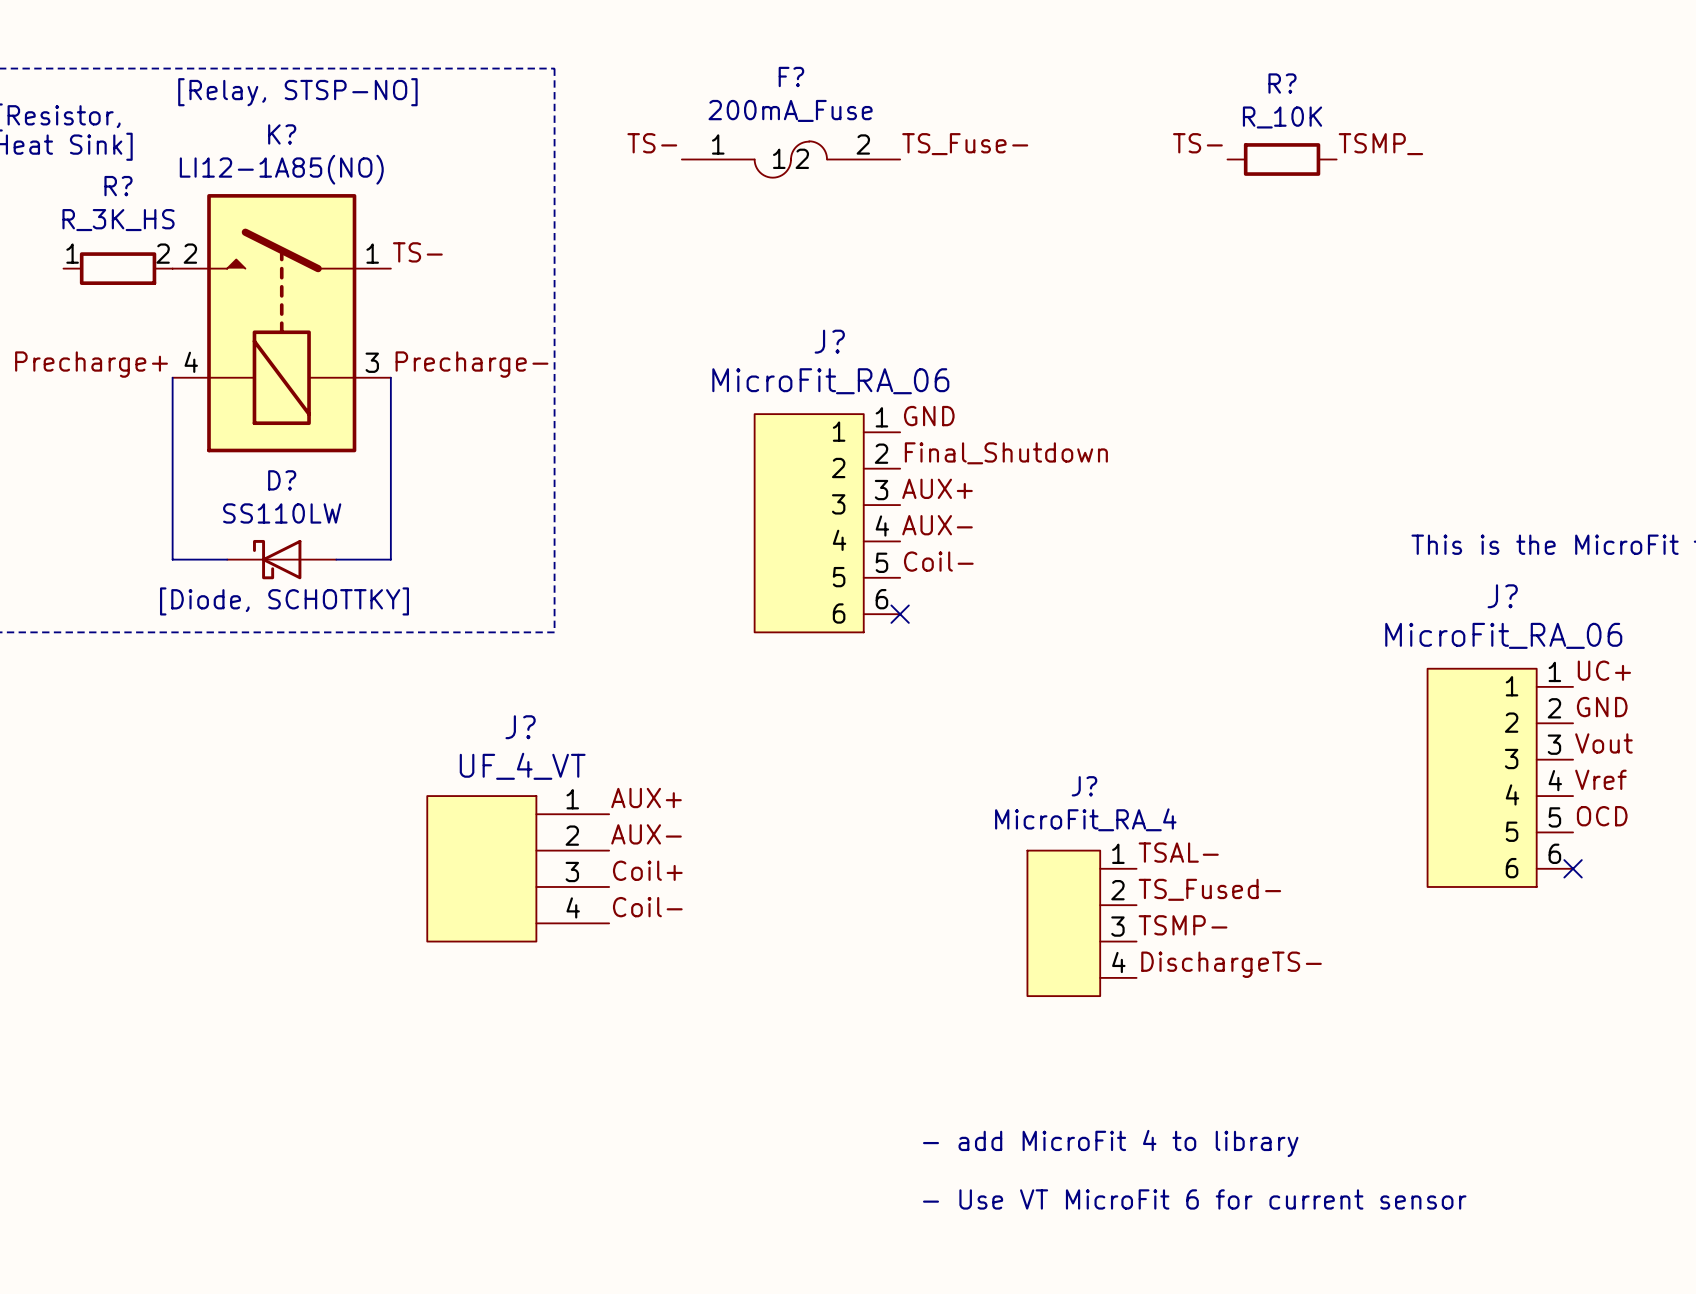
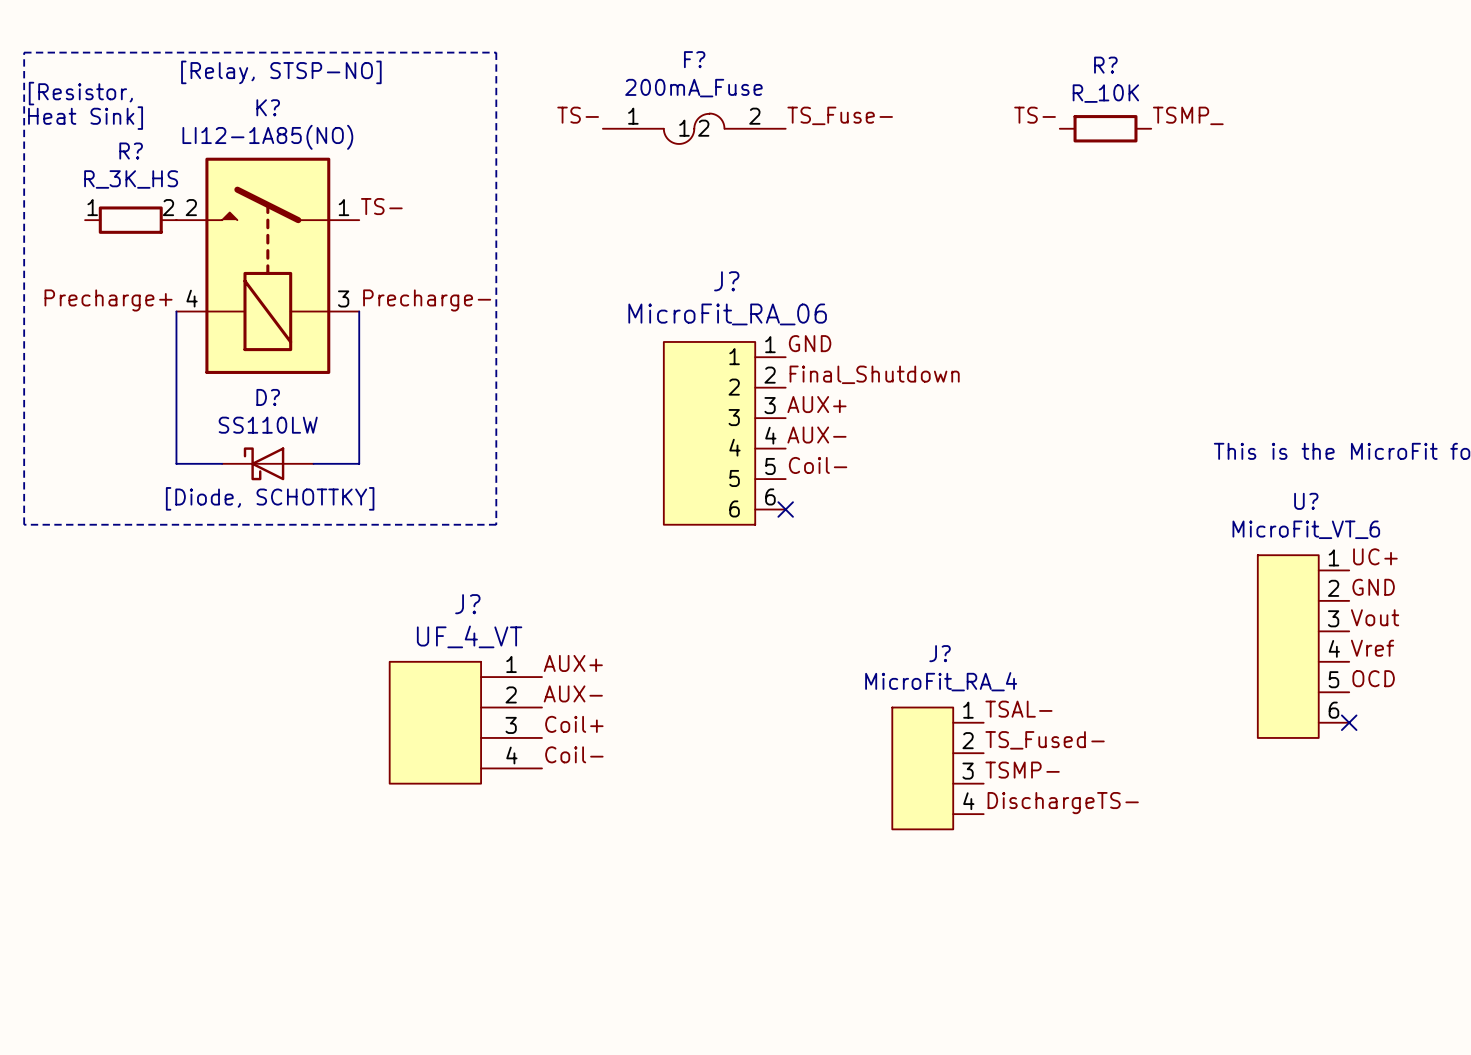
J?: MicroFit_RA_06 (1500, 777) -> none
U?: none -> MicroFit_VT_6 (1303, 646)
text: - add MicroFit 4 to library (1110, 1143) -> none
text: - Use VT MicroFit 6 for current sensor (1194, 1199) -> none

